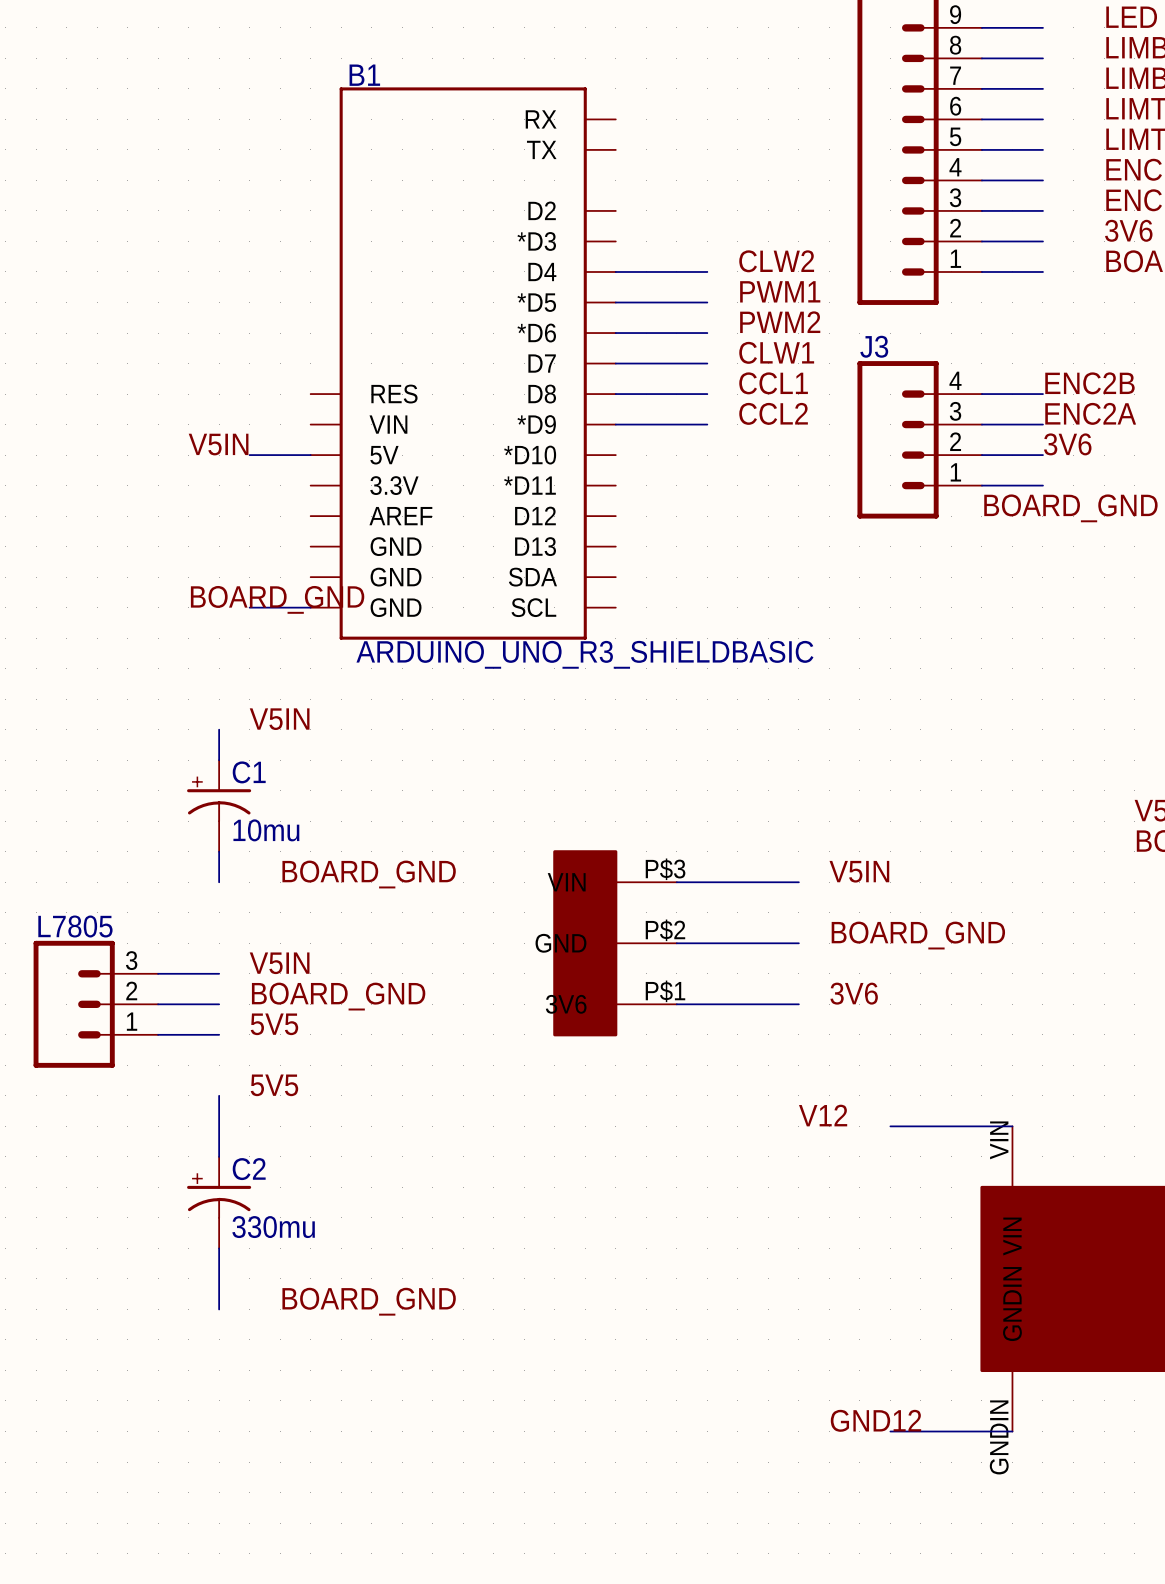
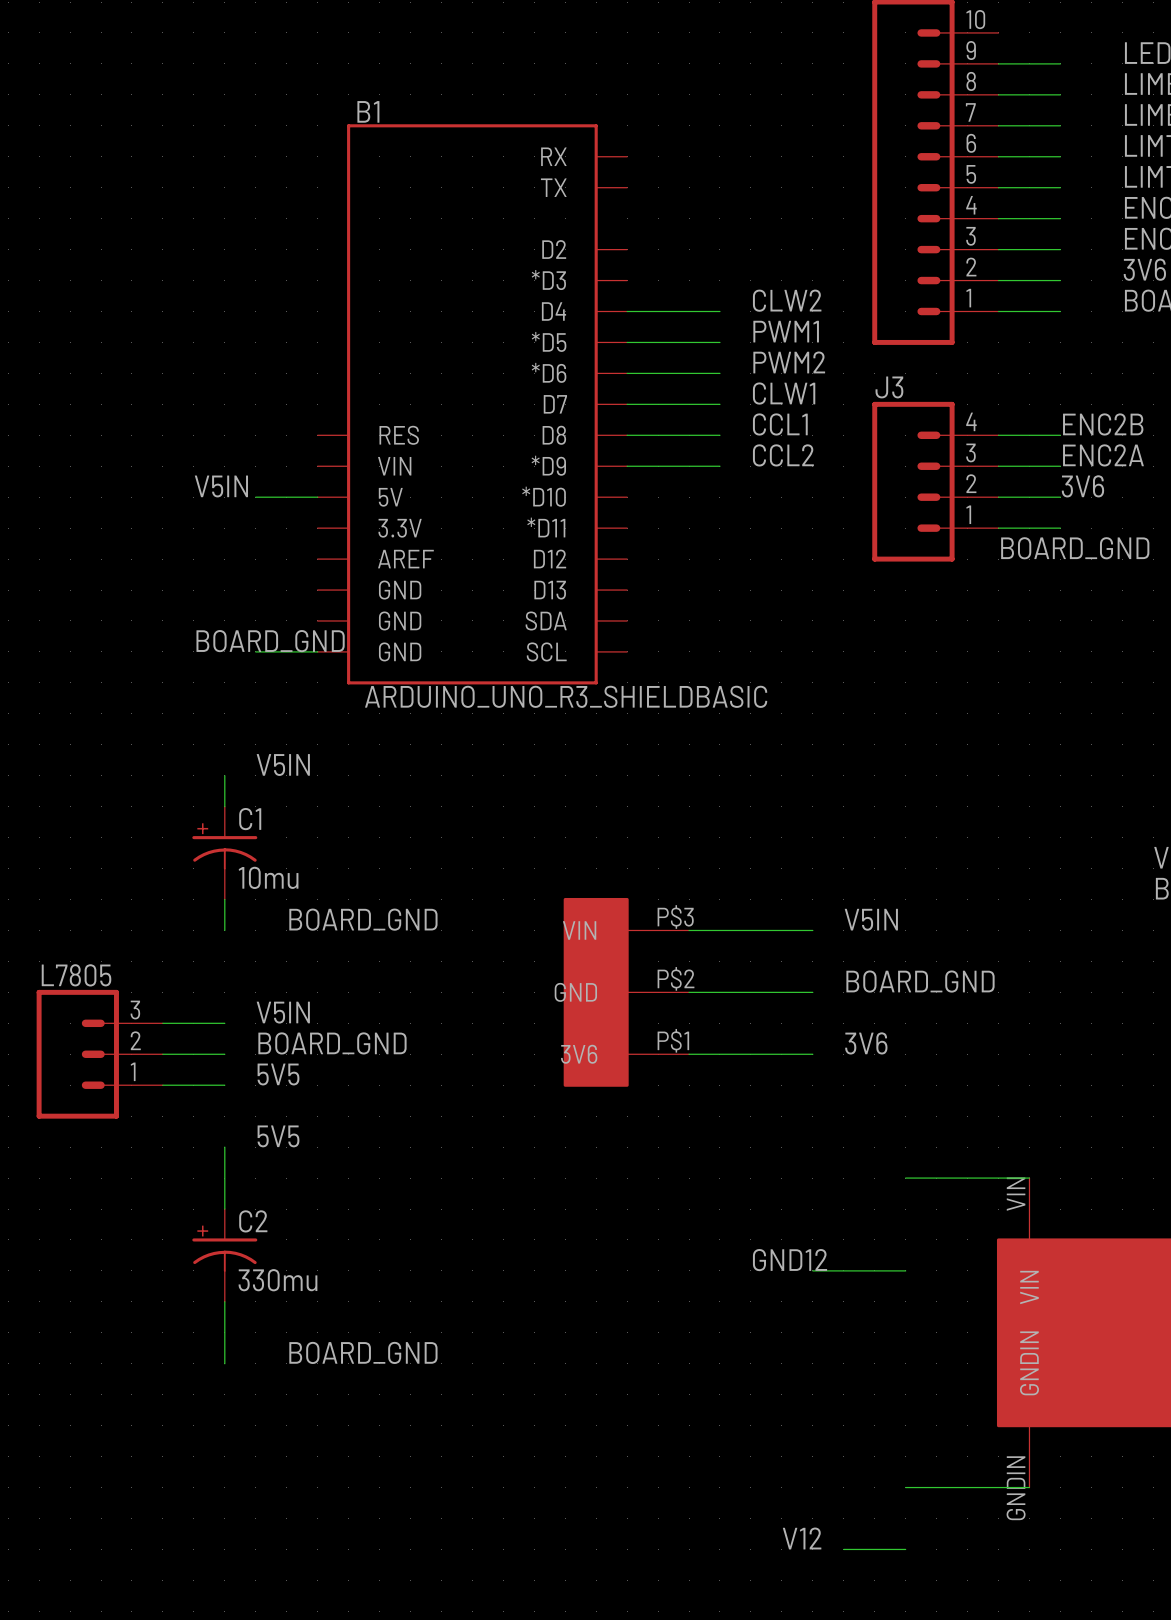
label: V12 (823, 1115) -> none
wire: none -> (812, 1270) (905, 1270)
label position: GND12 (875, 1420) -> GND12 (790, 1260)
label: none -> V12 (802, 1538)
wire: none -> (843, 1549) (905, 1549)

